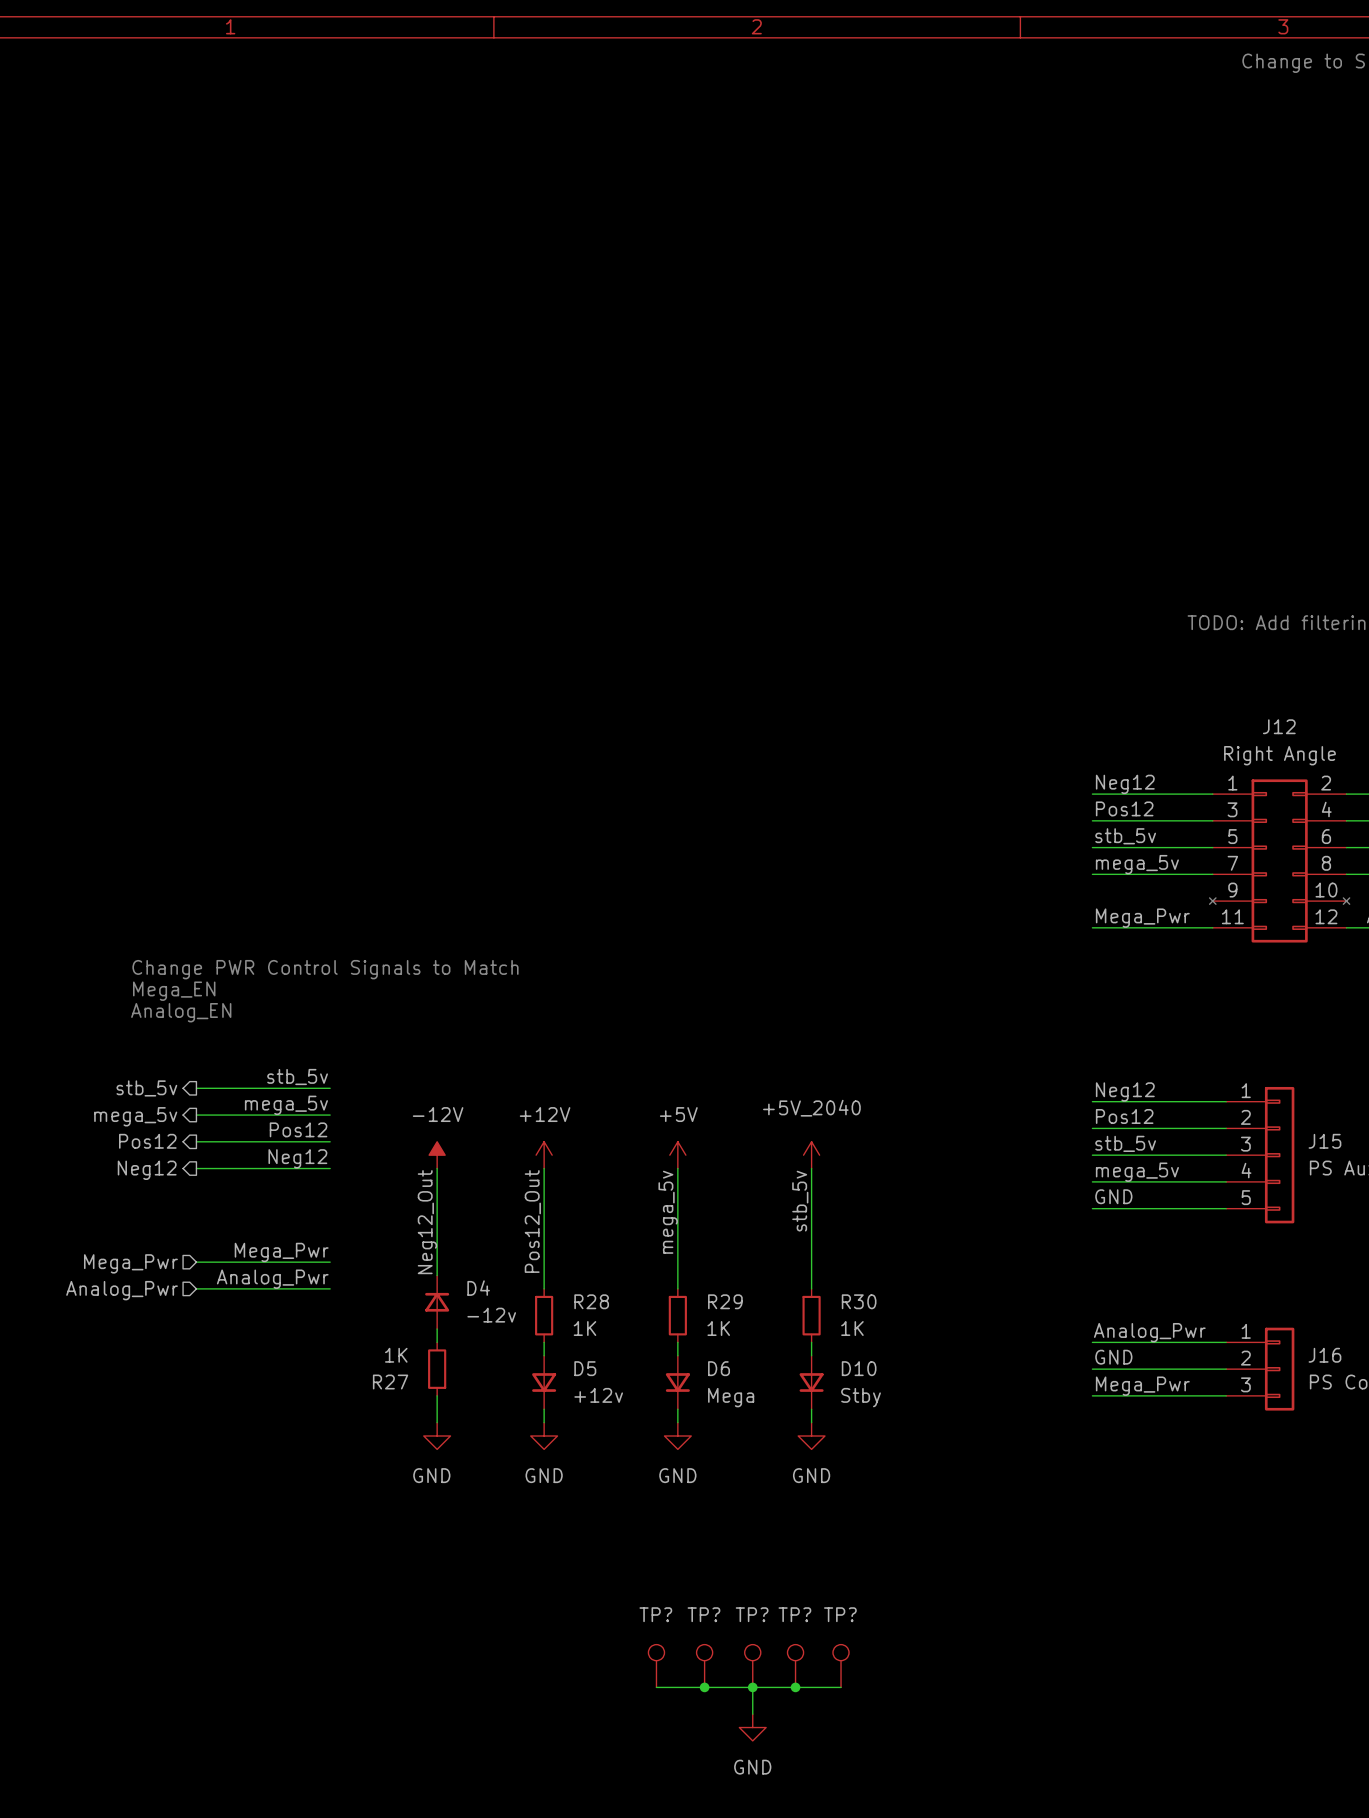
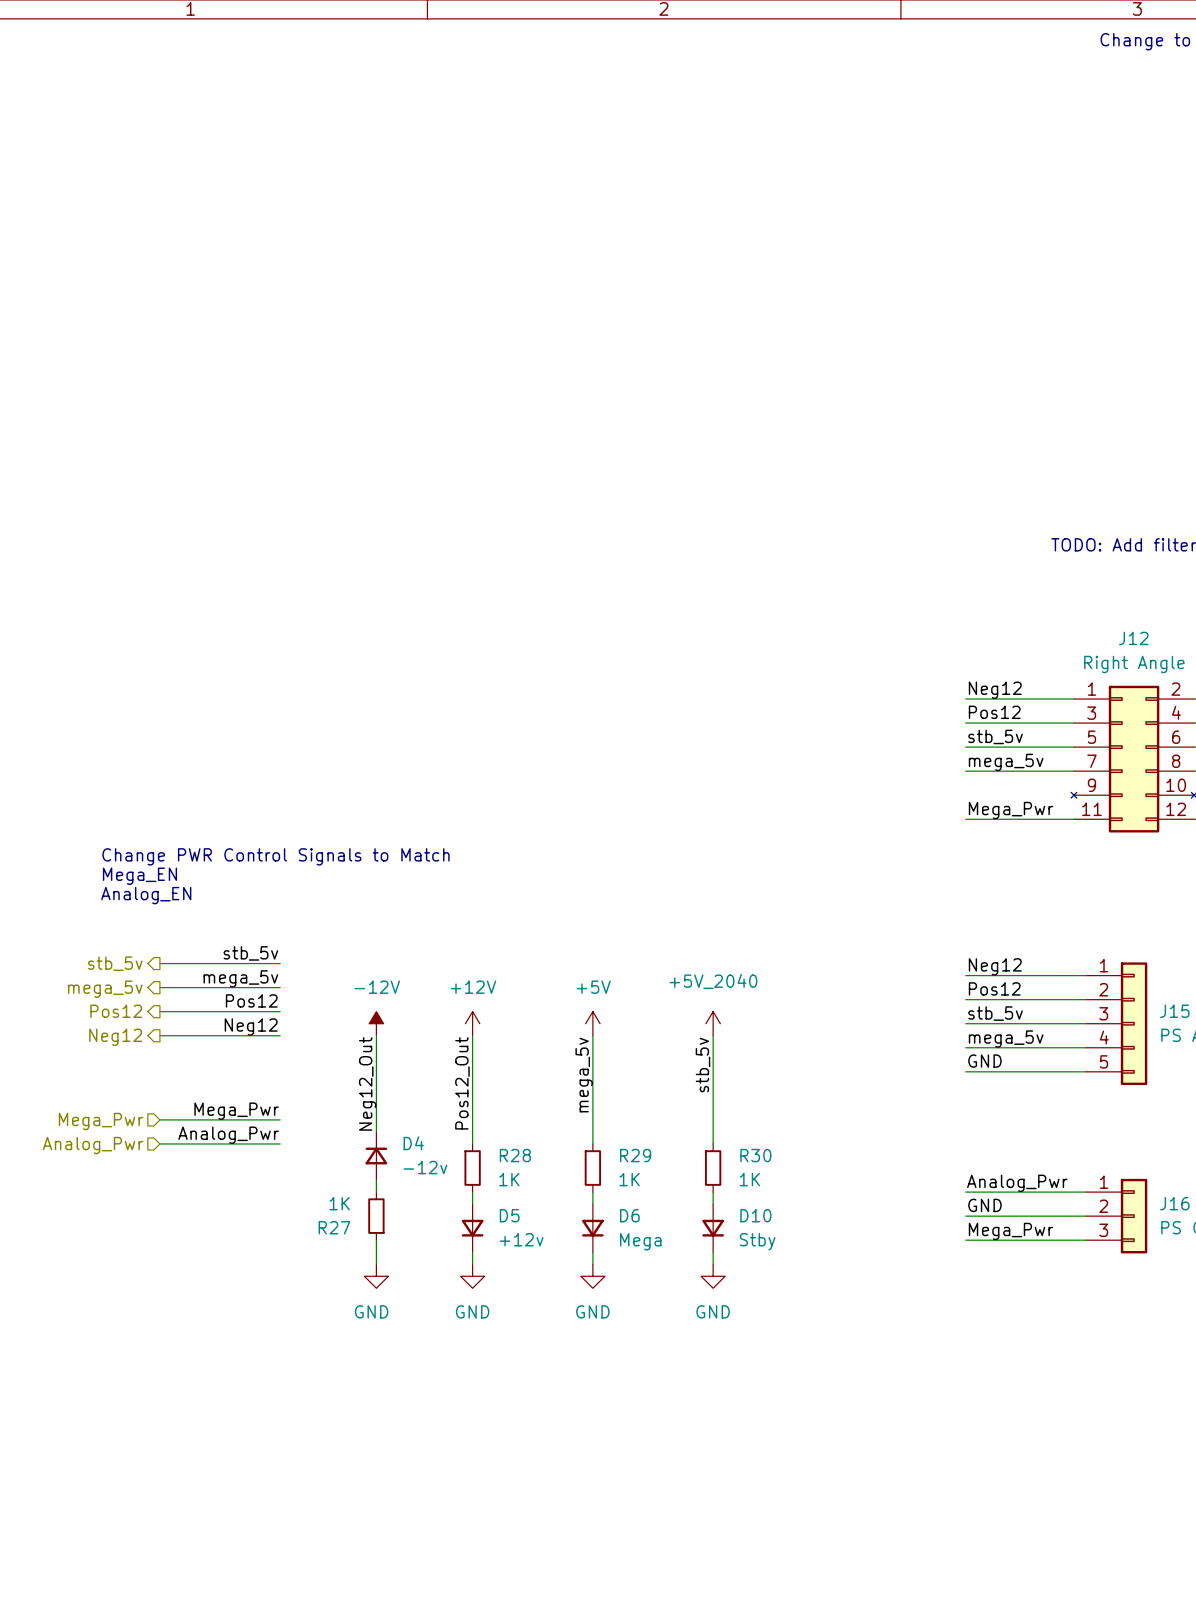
TP?: (656, 1666) -> none
TP?: (704, 1666) -> none
TP?: (752, 1666) -> none
TP?: (795, 1666) -> none
TP?: (841, 1666) -> none
wire: (656, 1687) (841, 1687) -> none
junction: (704, 1687) -> none
wire: (752, 1687) (752, 1714) -> none
junction: (752, 1687) -> none
junction: (795, 1687) -> none
power symbol: GND (752, 1727) -> none

